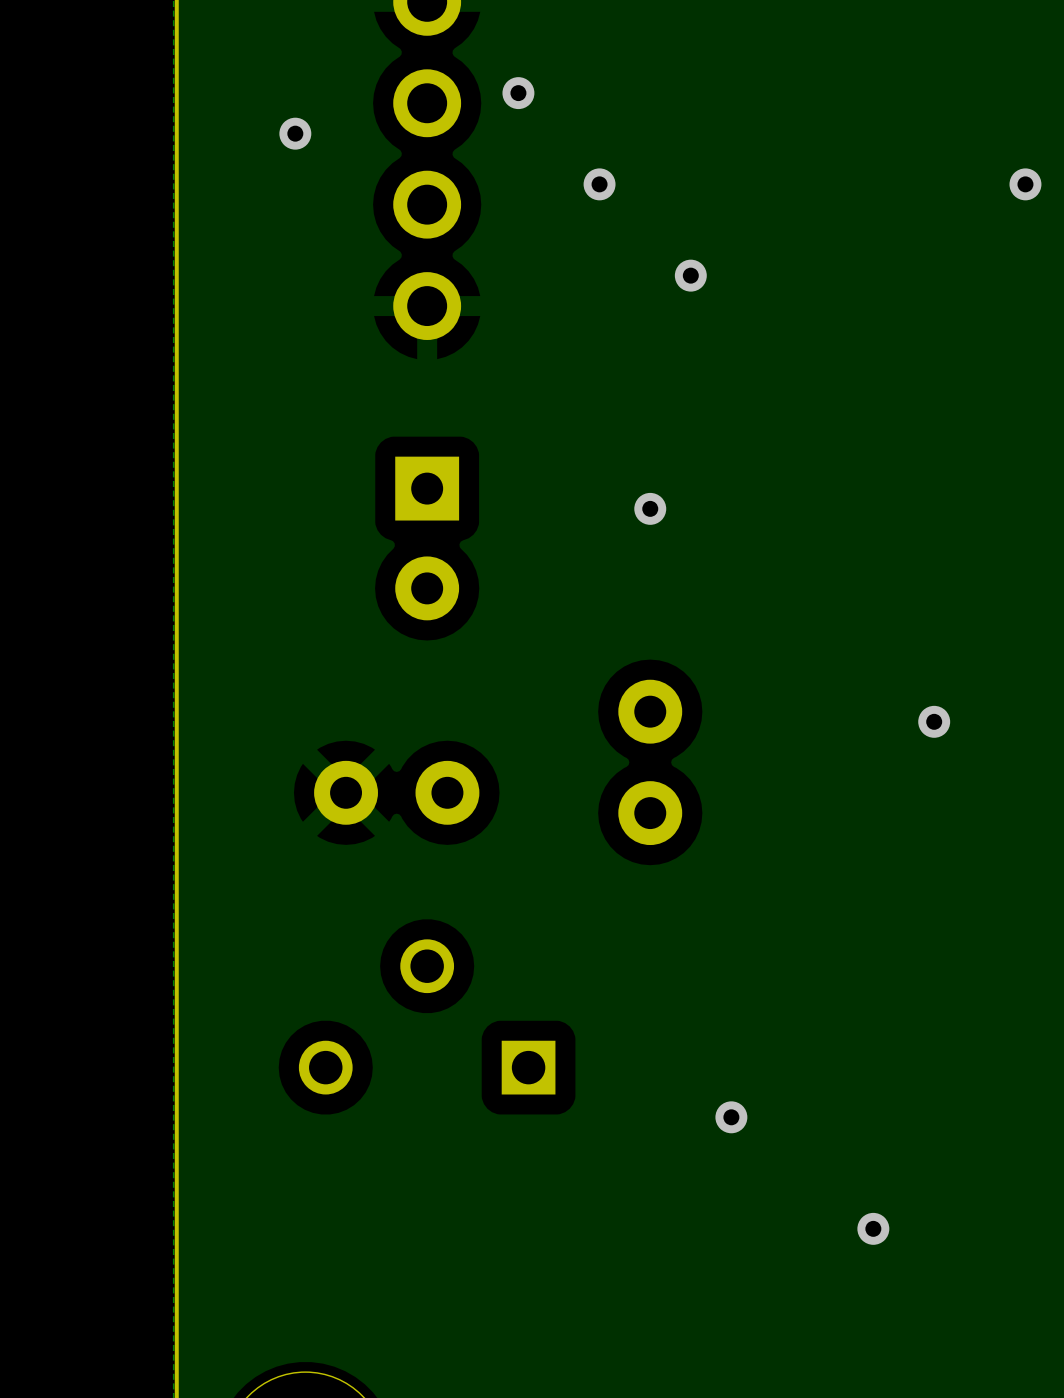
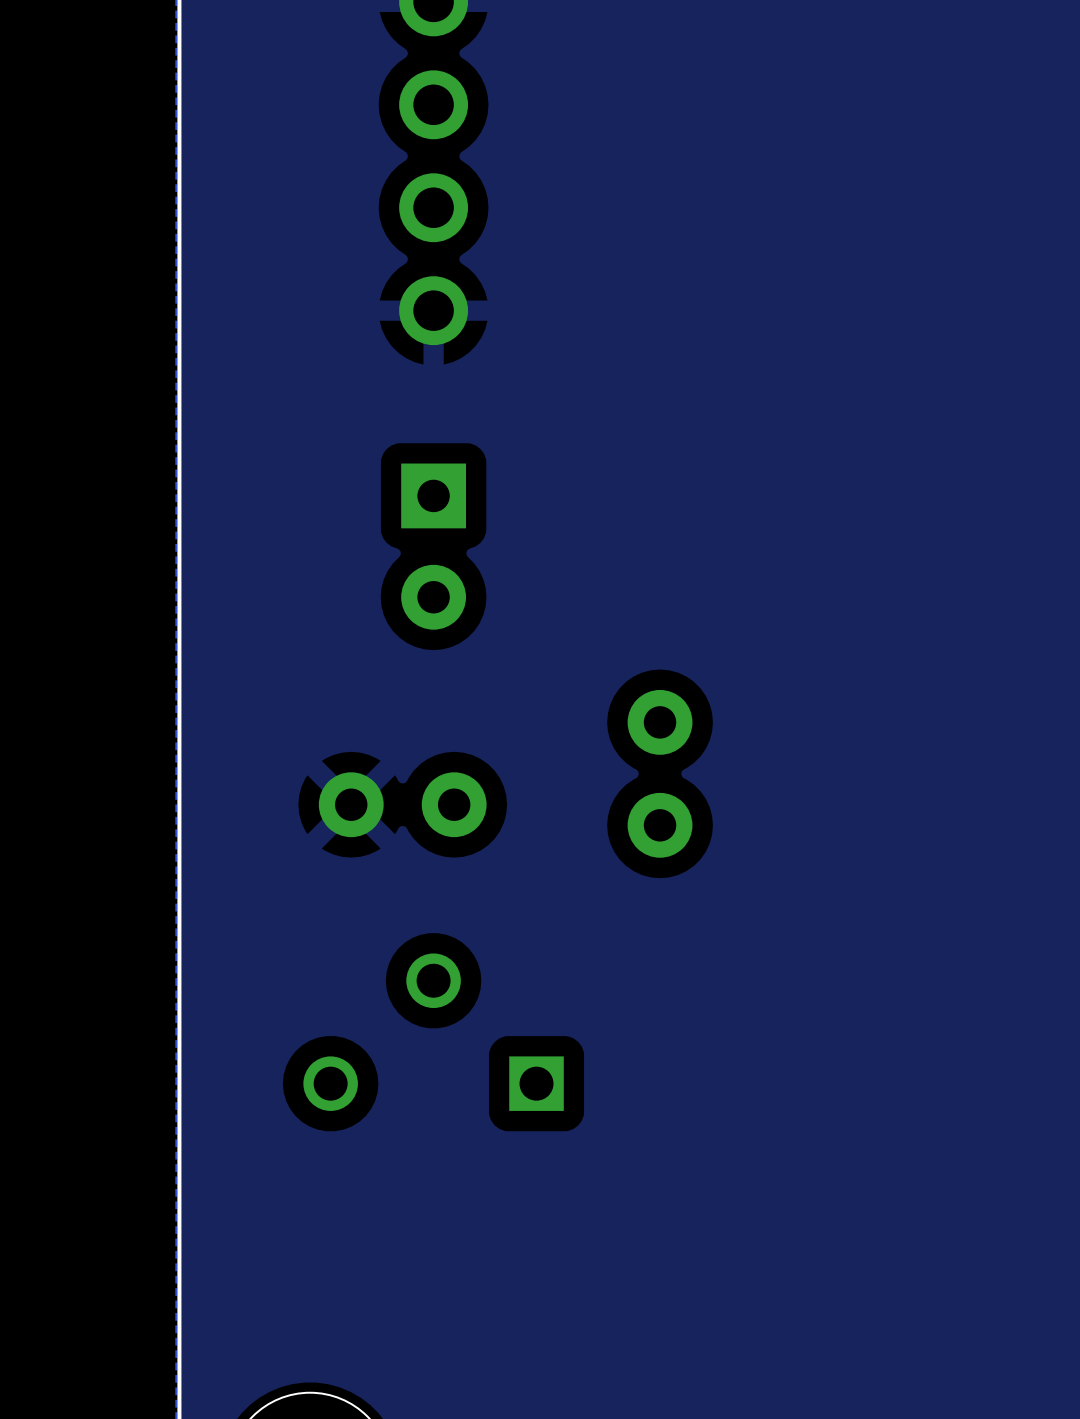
via: (518, 93) -> none
via: (295, 133) -> none
via: (599, 184) -> none
via: (1025, 184) -> none
via: (690, 275) -> none
via: (650, 508) -> none
via: (934, 721) -> none
via: (731, 1117) -> none
via: (873, 1228) -> none

